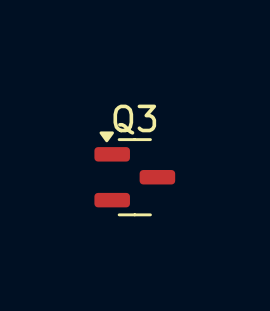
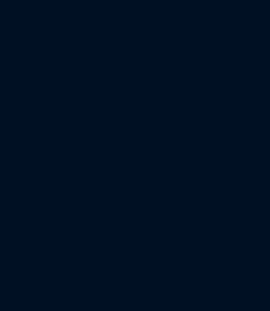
Q3: (134, 173) -> none

